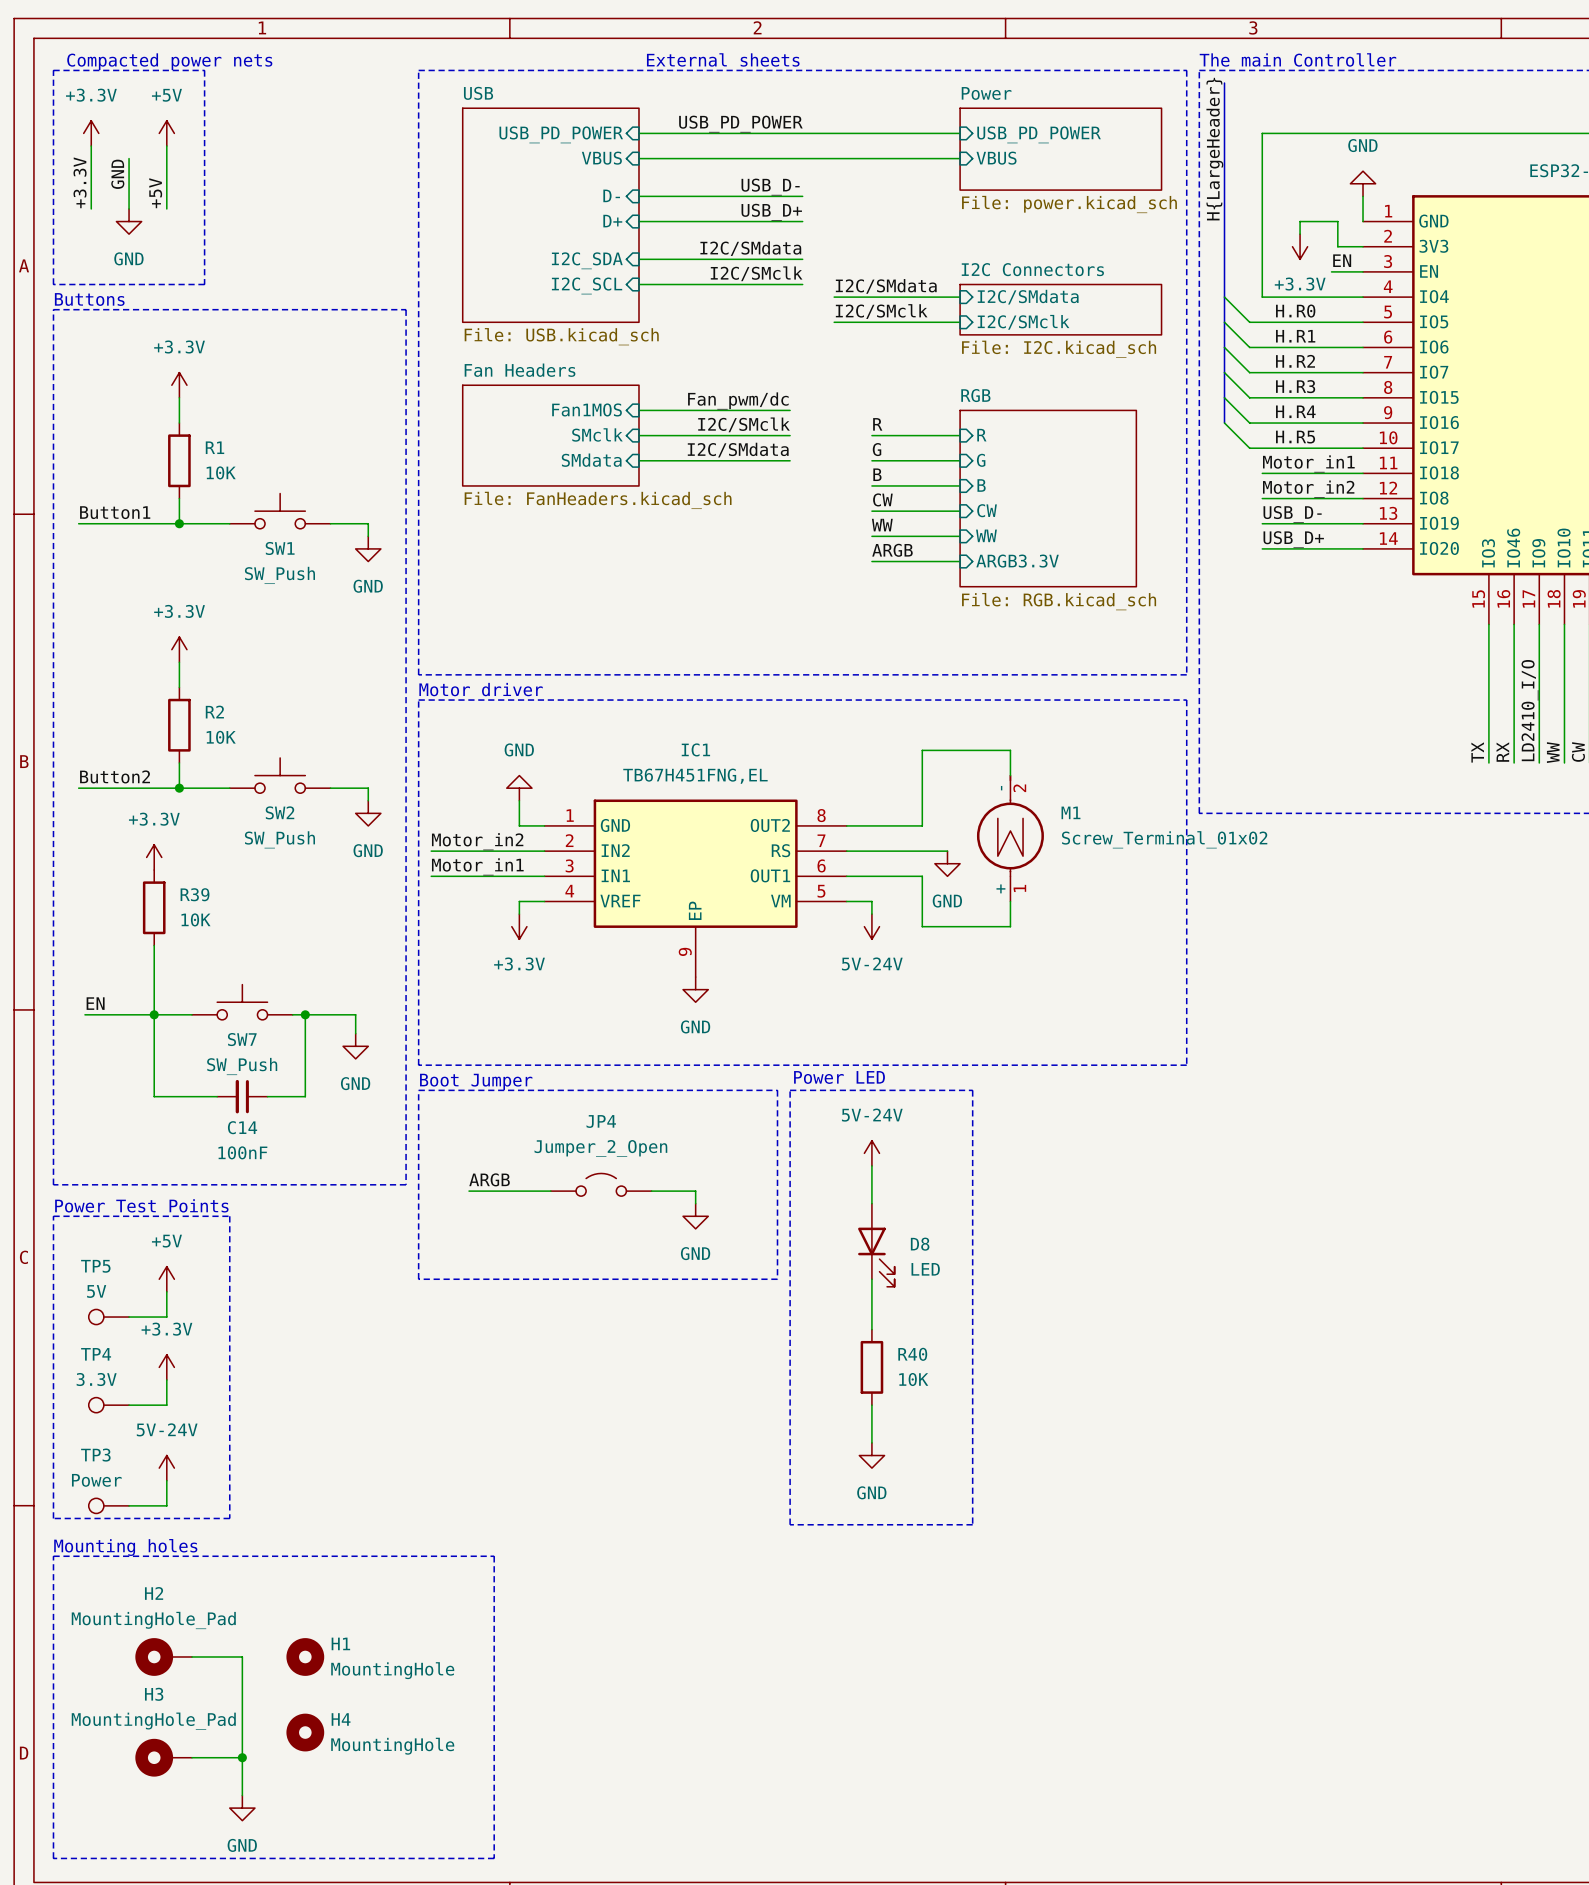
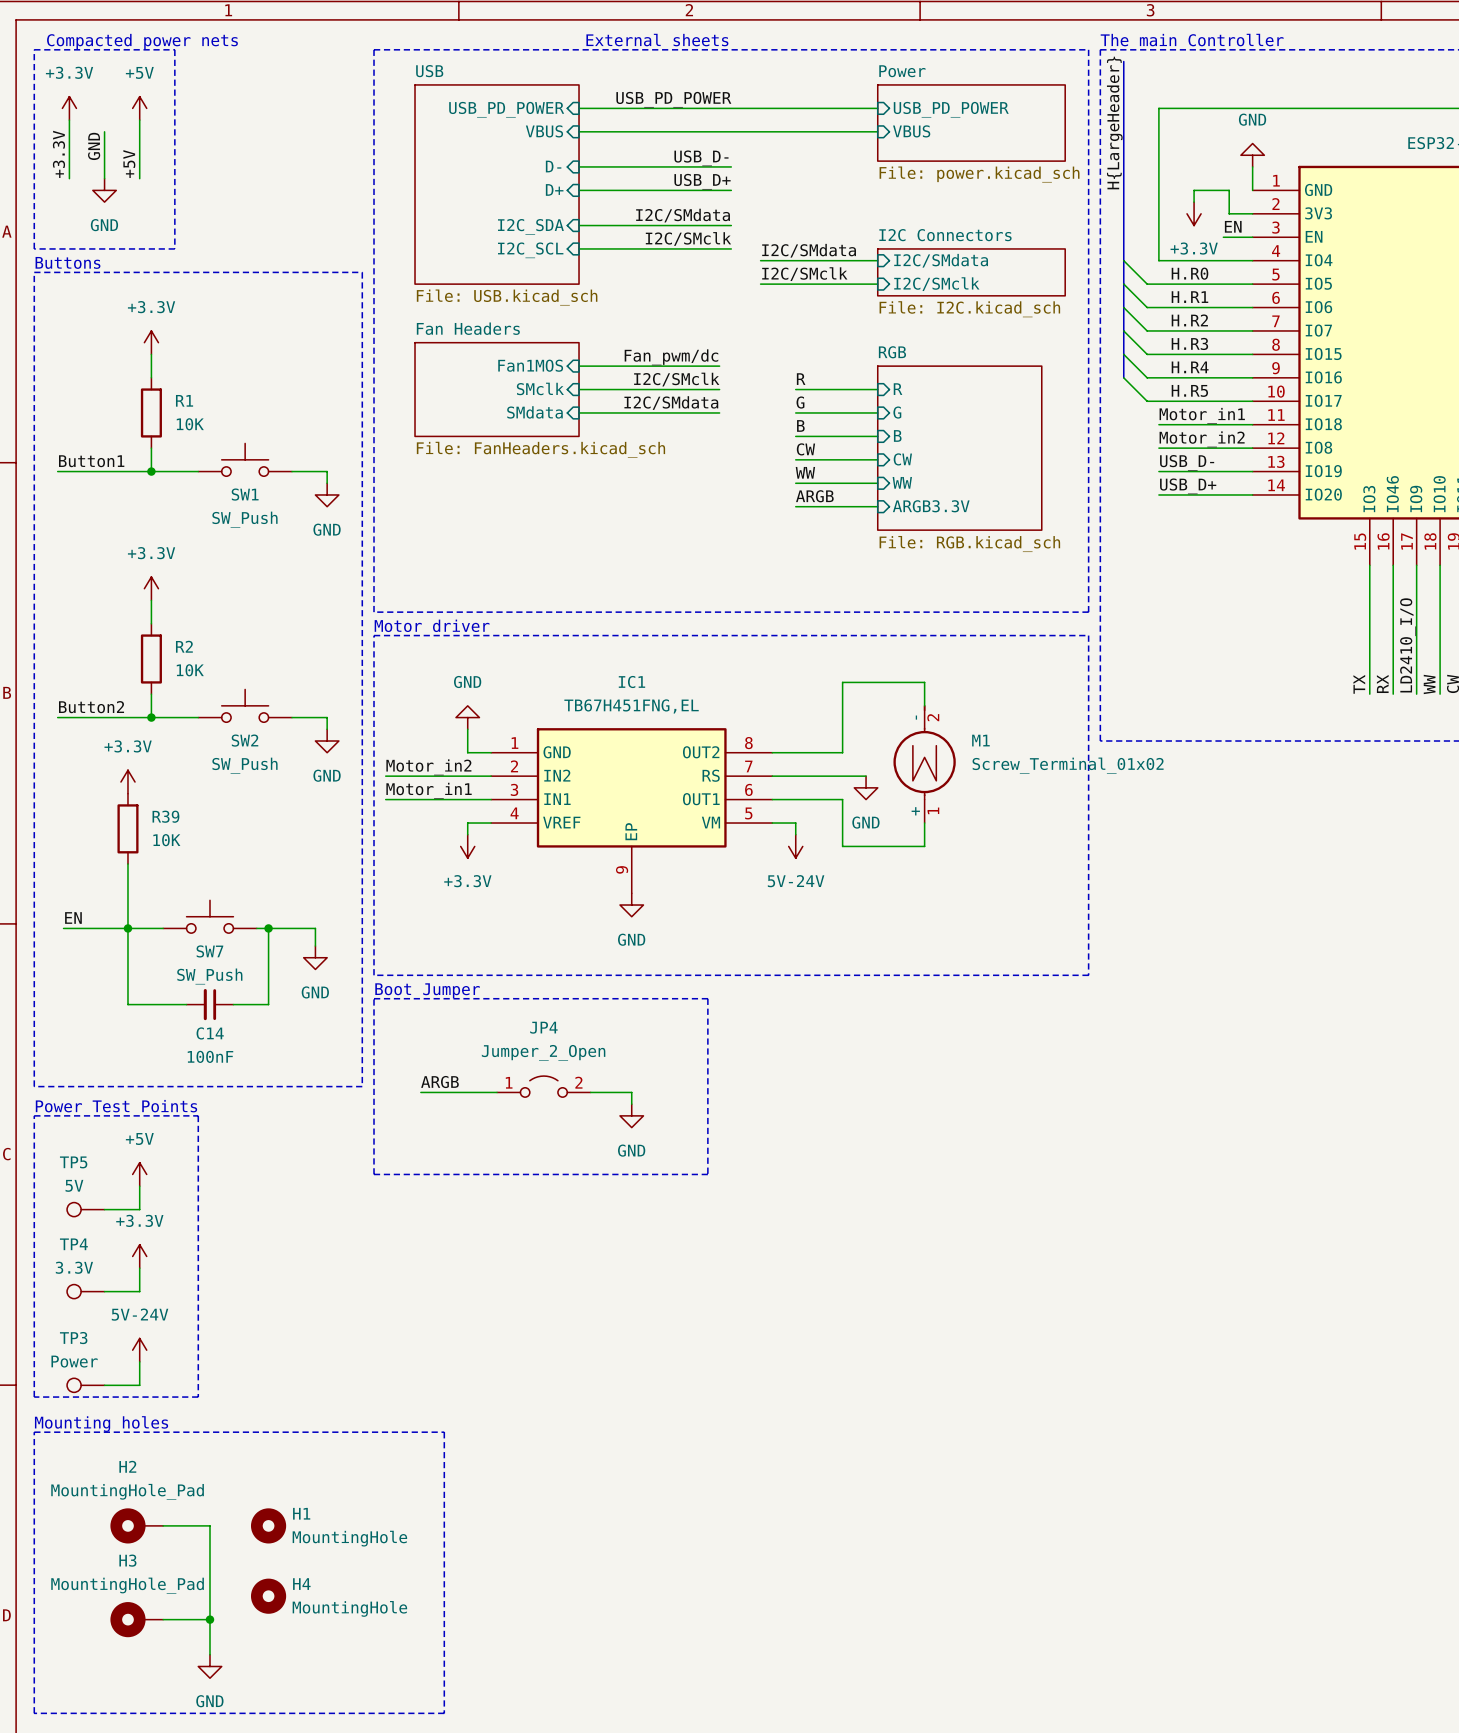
text: Power LED (839, 1077) -> none
line: (790, 1090) (972, 1090) (972, 1524) (790, 1524) (790, 1090) -> none
power symbol: 5V-24V (871, 1153) -> none
wire: (871, 1165) (871, 1203) -> none
JP4 pin number: none -> 1 (509, 1082)
JP4 pin number: none -> 2 (578, 1082)
D8: LED (876, 1245) -> none
wire: (871, 1279) (871, 1329) -> none
R40: 10K (871, 1367) -> none
wire: (871, 1405) (871, 1442) -> none
power symbol: GND (871, 1455) -> none

